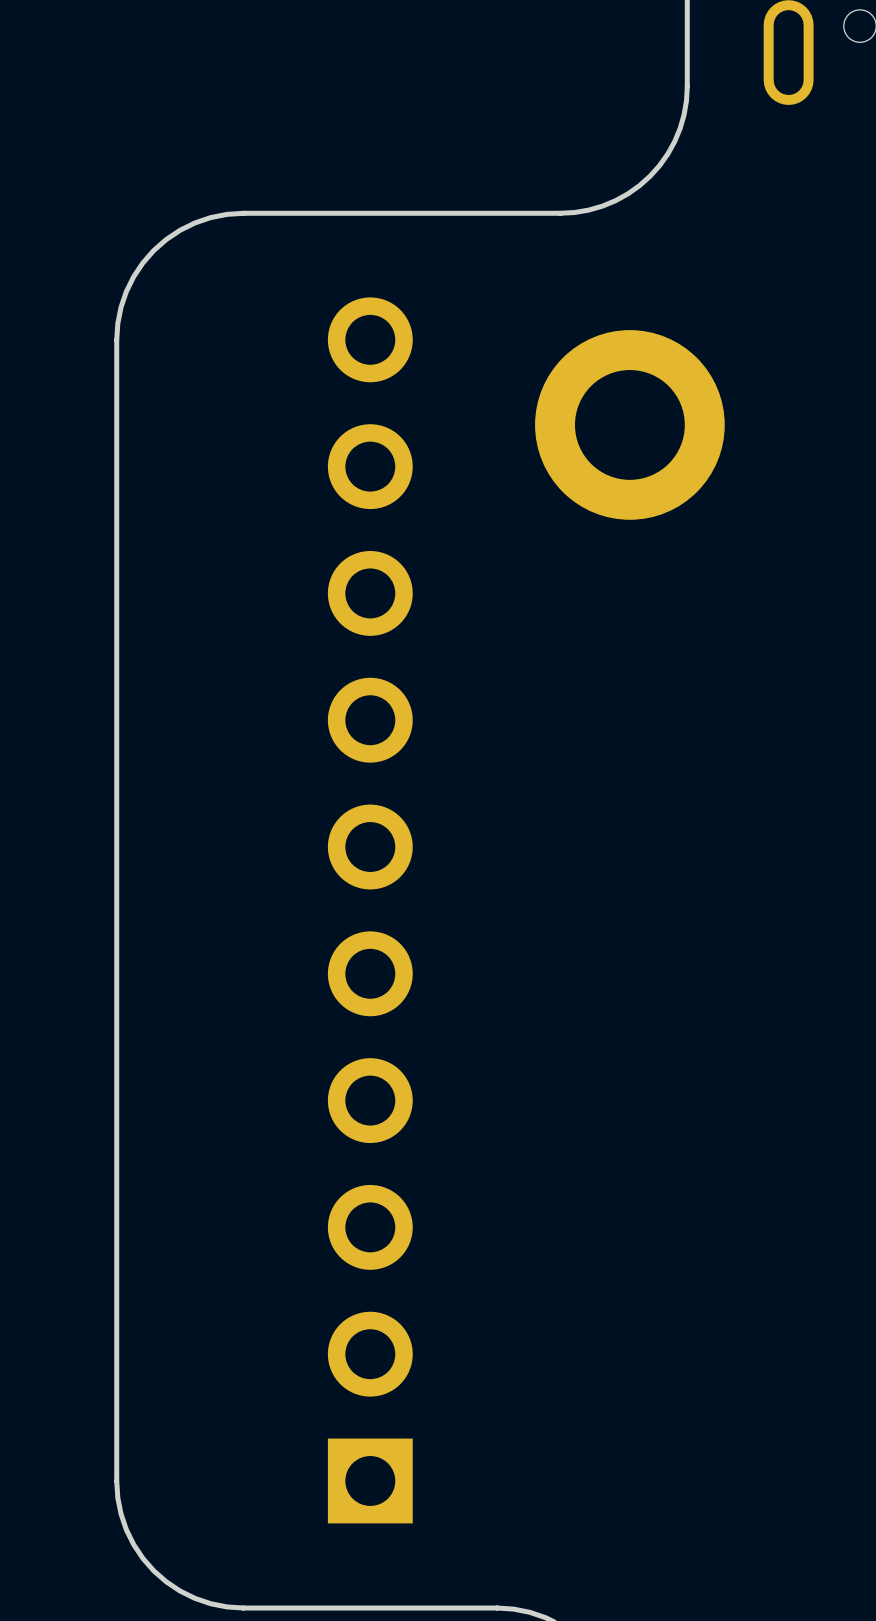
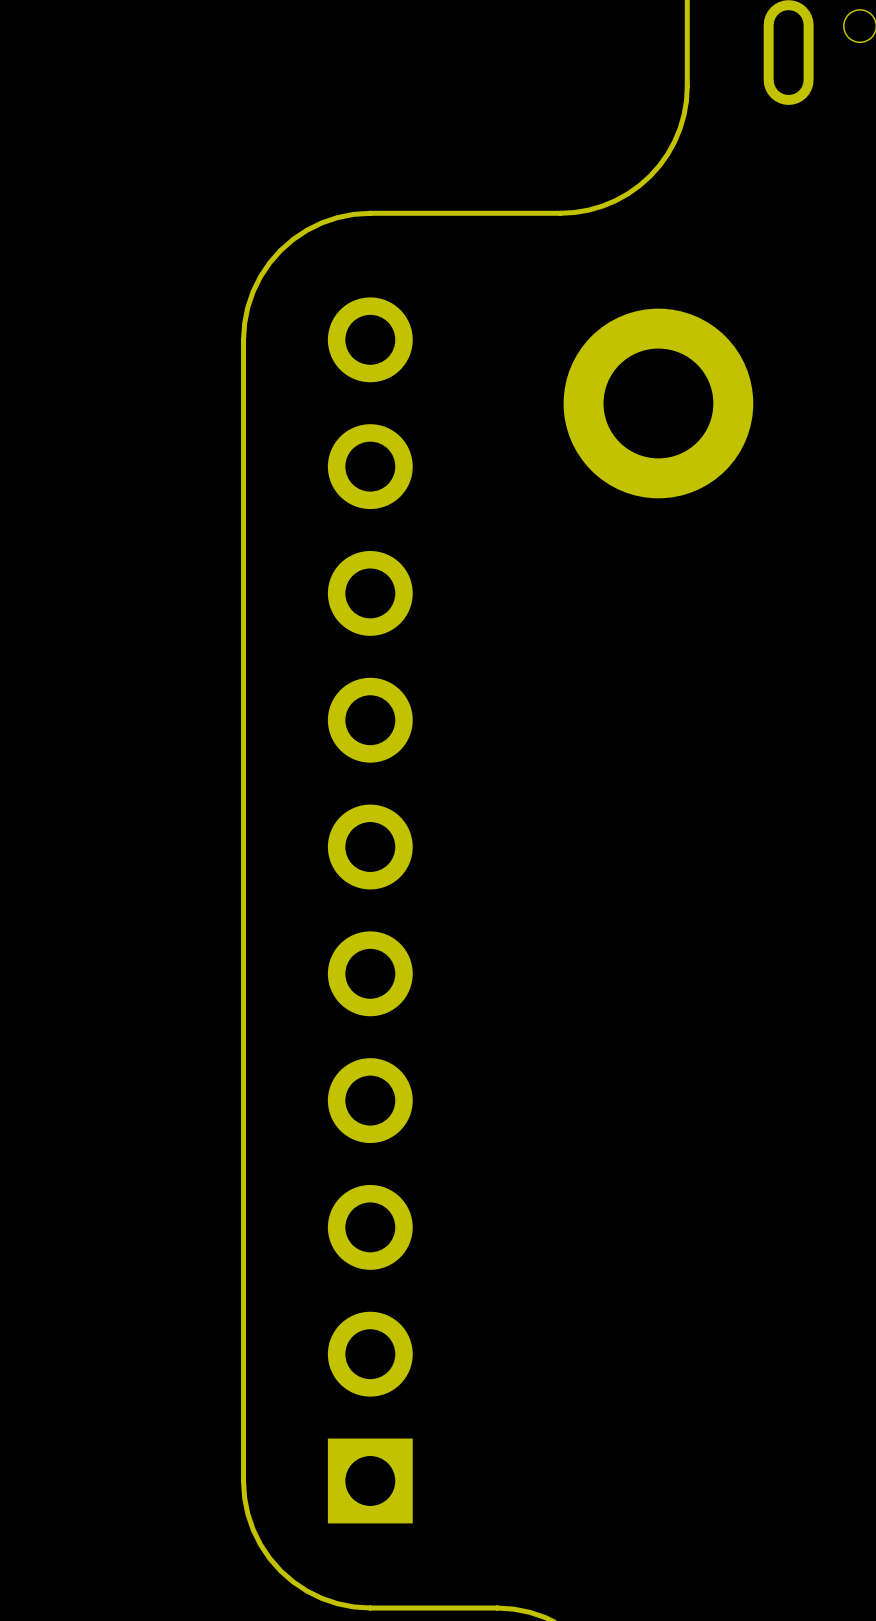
board edge: (370, 213) (226, 214) (210, 217) (180, 230) (153, 250) (133, 276) (121, 307) (116, 340) (116, 1481) (121, 1514) (133, 1544) (142, 1558) (166, 1581) (195, 1598) (226, 1606) (243, 1608) (370, 1608) -> (370, 213) (353, 214) (321, 222) (293, 239) (280, 250) (260, 276) (253, 291) (247, 307) (243, 340) (244, 1497) (253, 1529) (260, 1544) (280, 1570) (293, 1581) (321, 1598) (337, 1603) (370, 1608)
part position: (629, 424) -> (658, 403)

